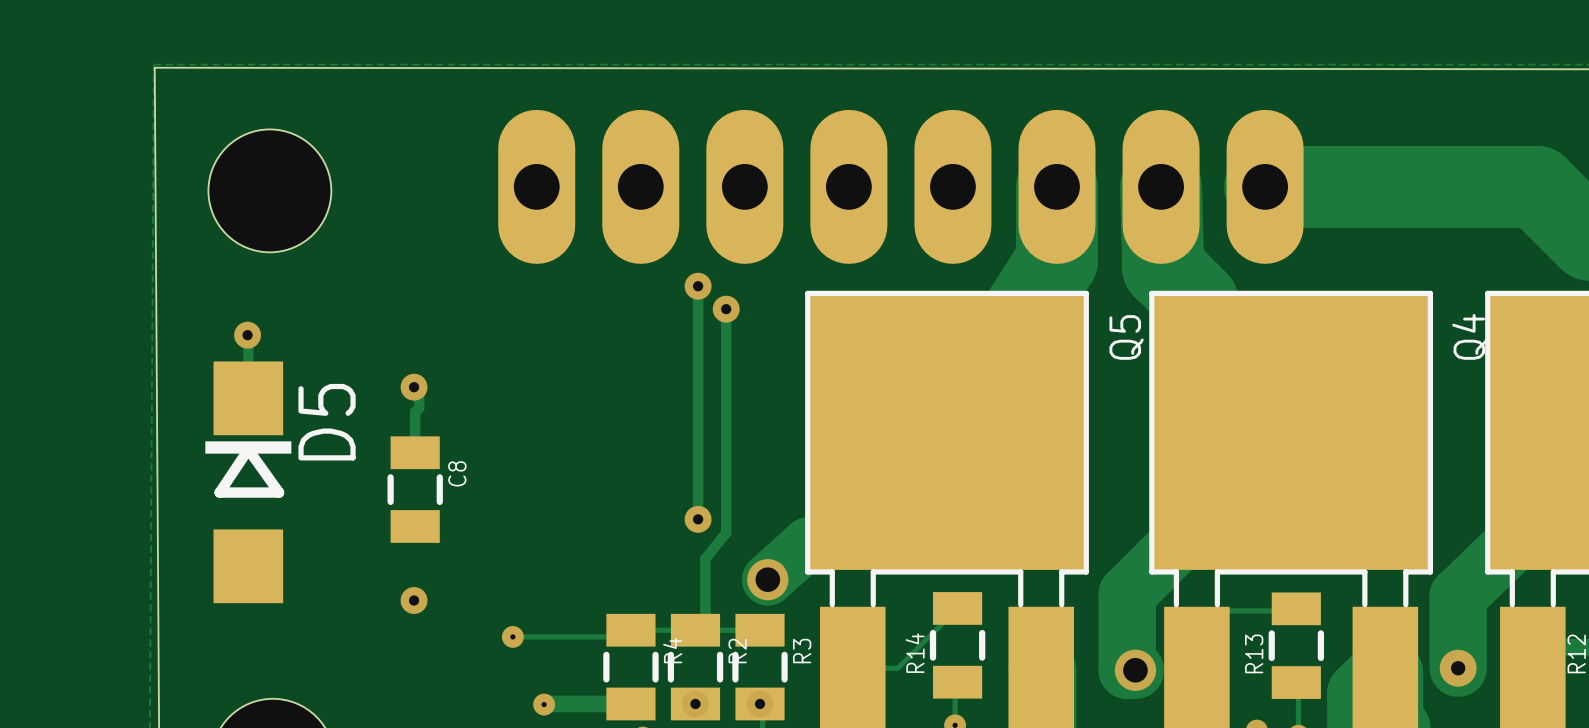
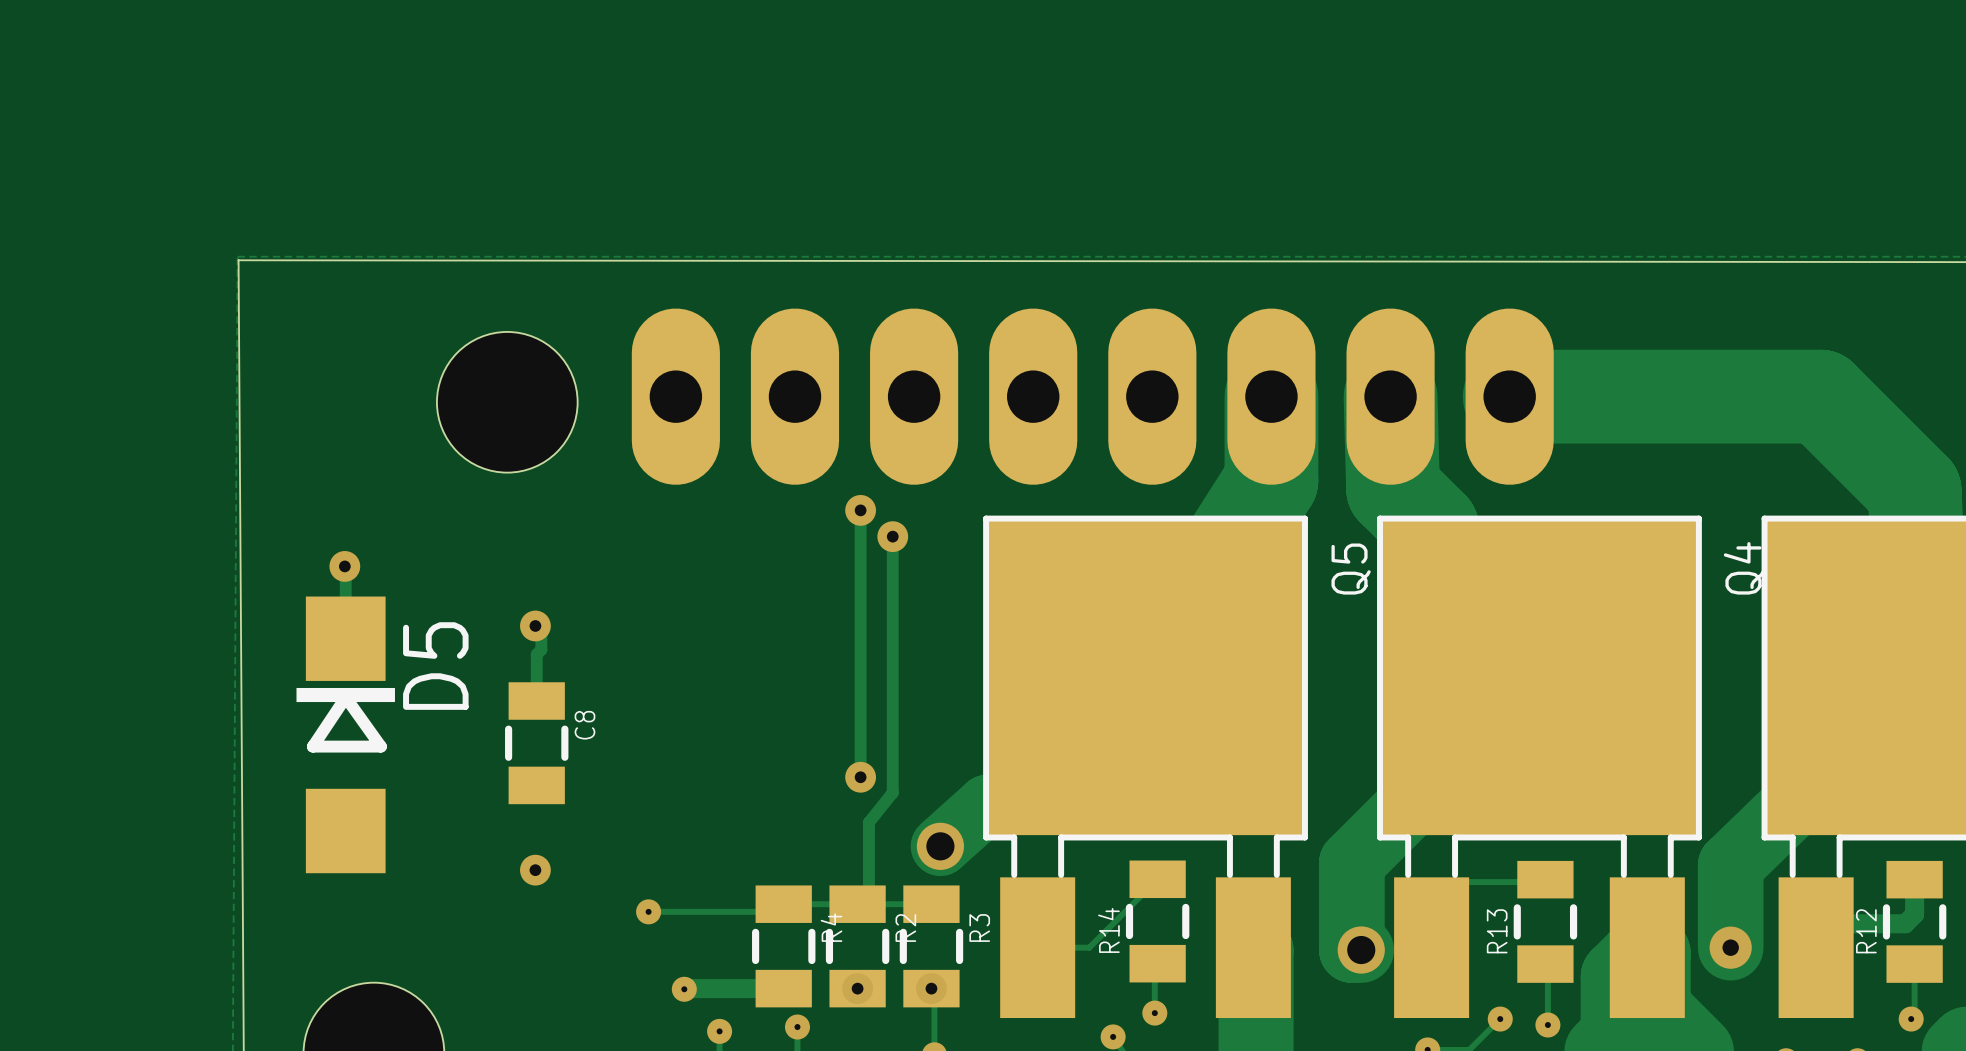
hole position: (269, 190) -> (507, 402)

